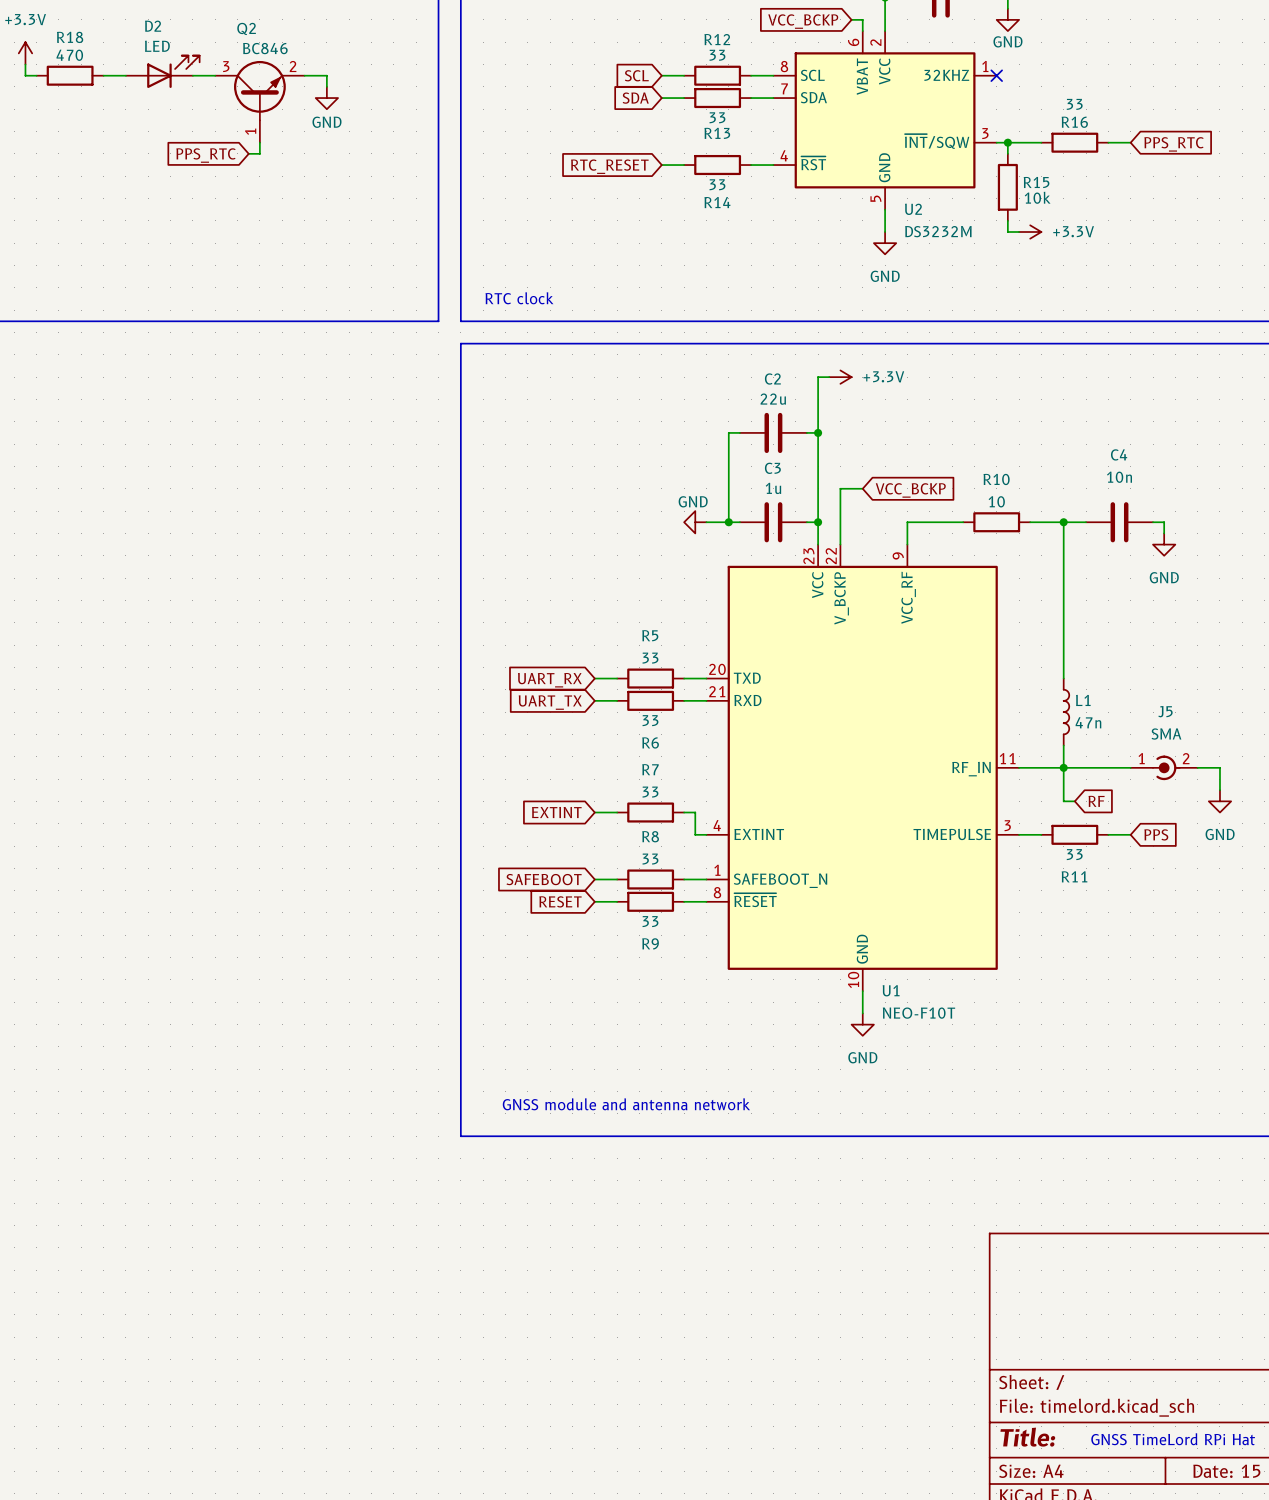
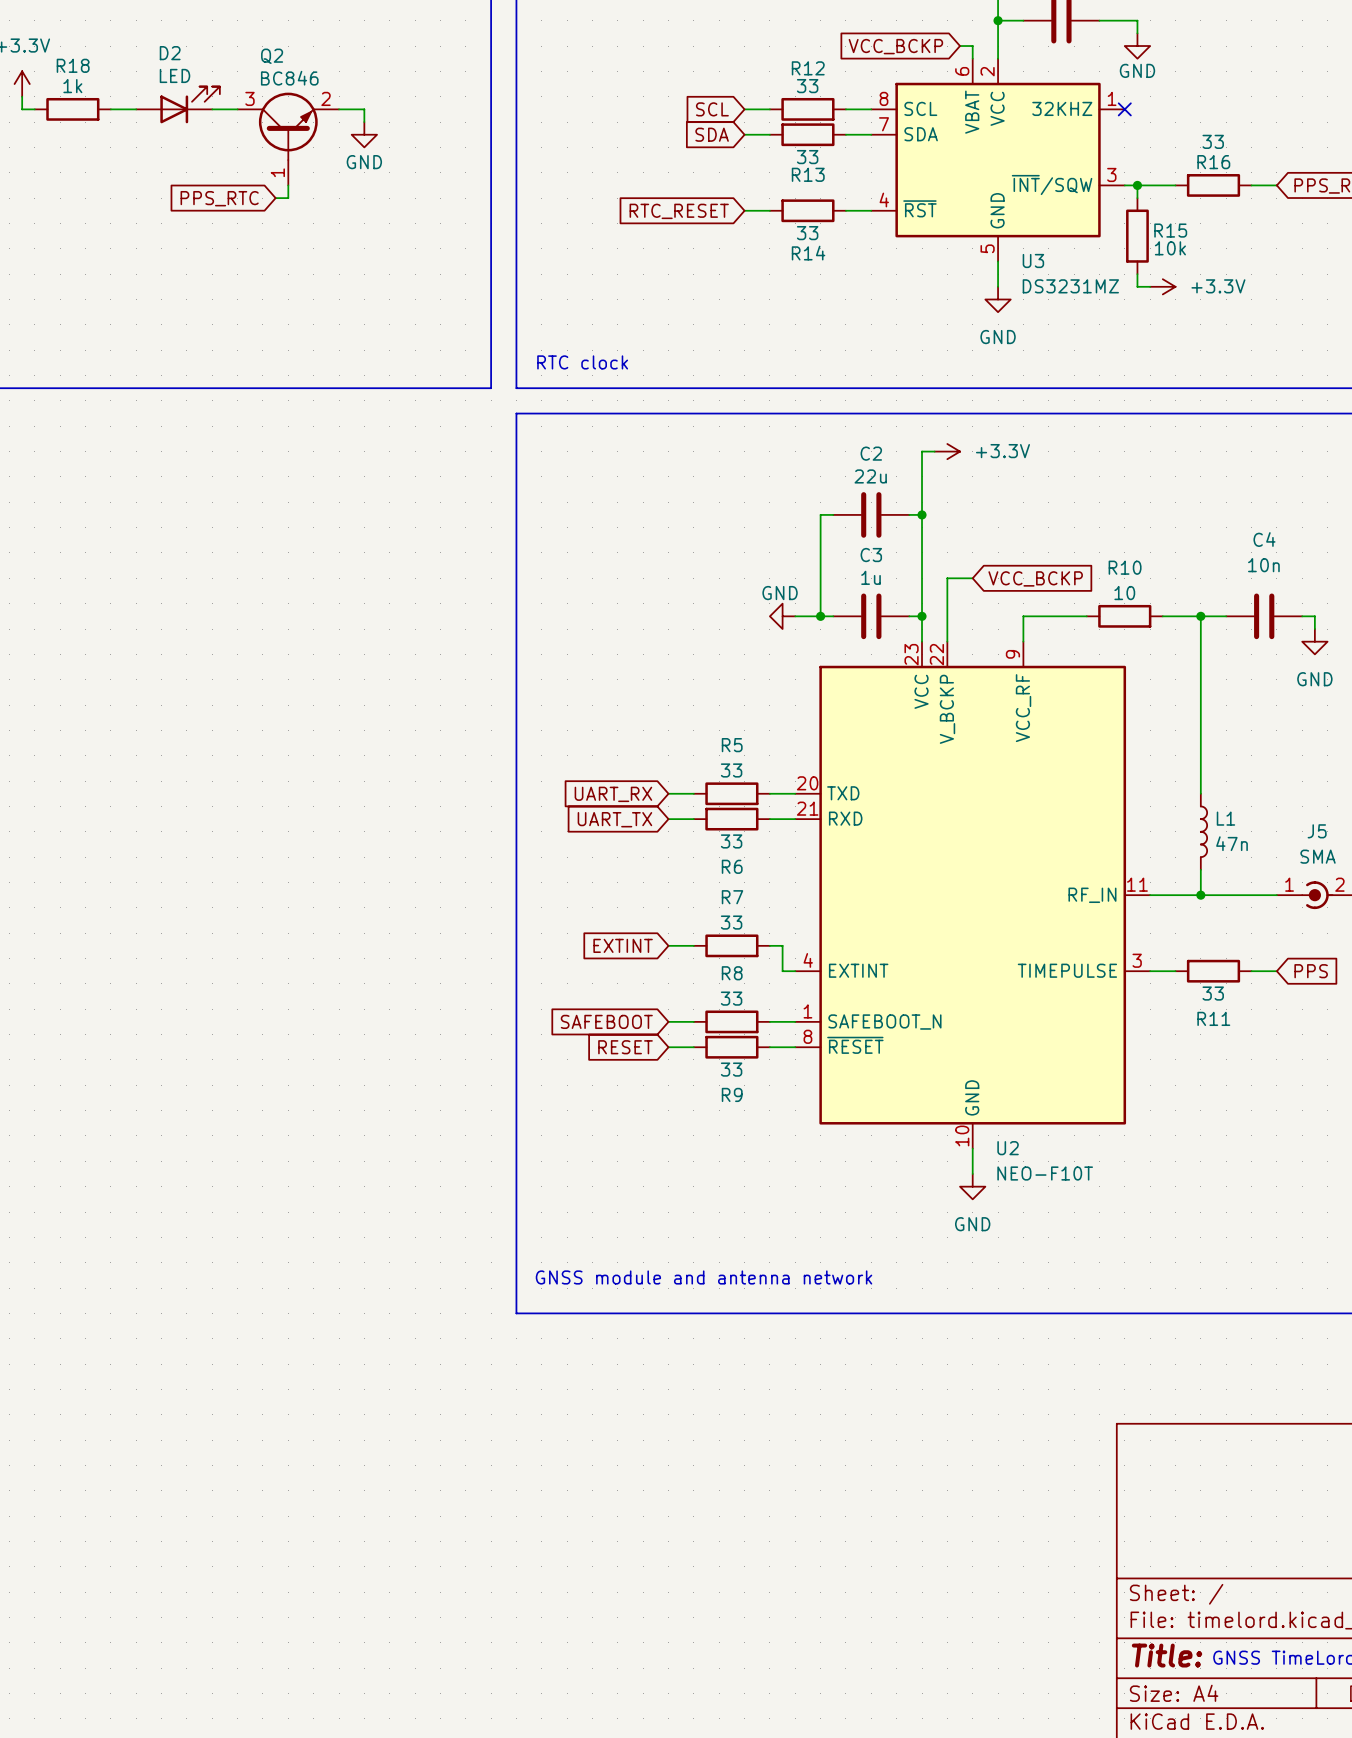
R18 value: 470 (69, 55) -> 1k (72, 86)
U2 name: U2 (913, 209) -> U3 (1033, 260)
U2 value: DS3232M (938, 231) -> DS3231MZ (1070, 286)
wire: (1063, 767) (1063, 801) (1074, 801) -> none
global label: RF (1096, 801) -> none
U1 name: U1 (891, 990) -> U2 (1008, 1148)

